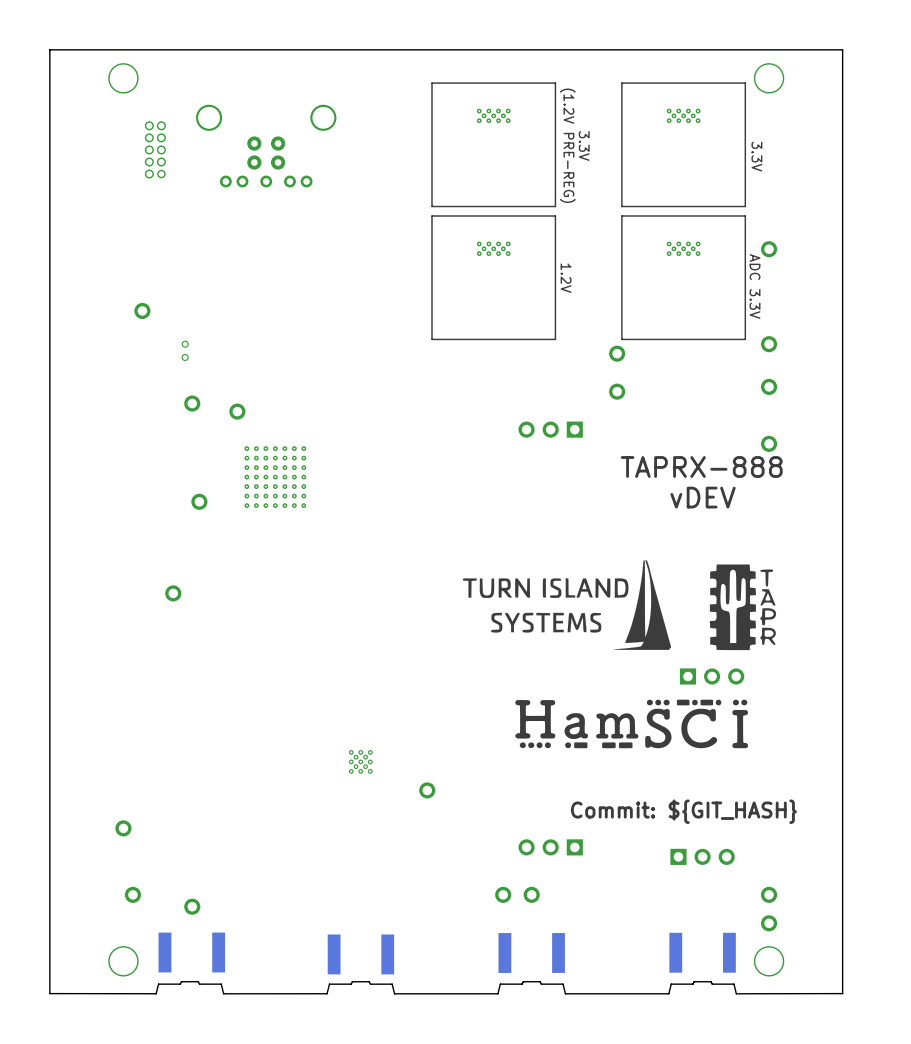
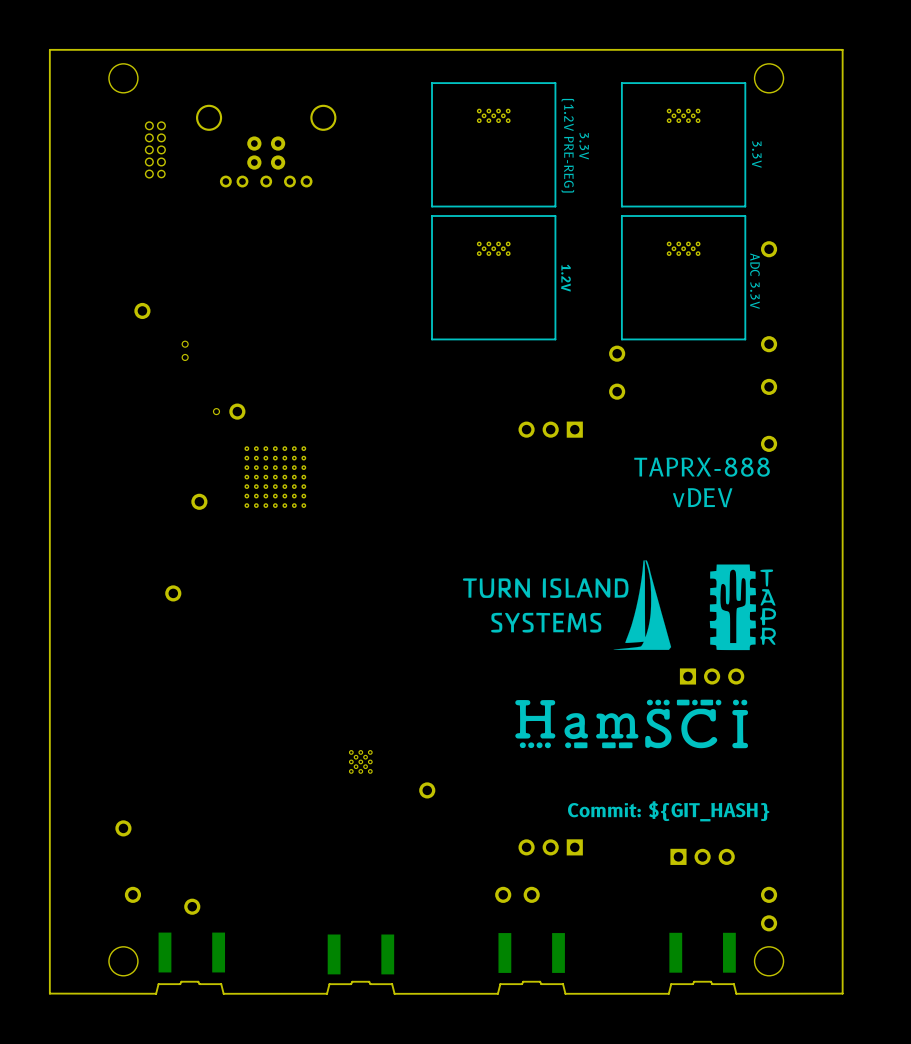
part: (192, 403) -> none
part: none -> (216, 411)

